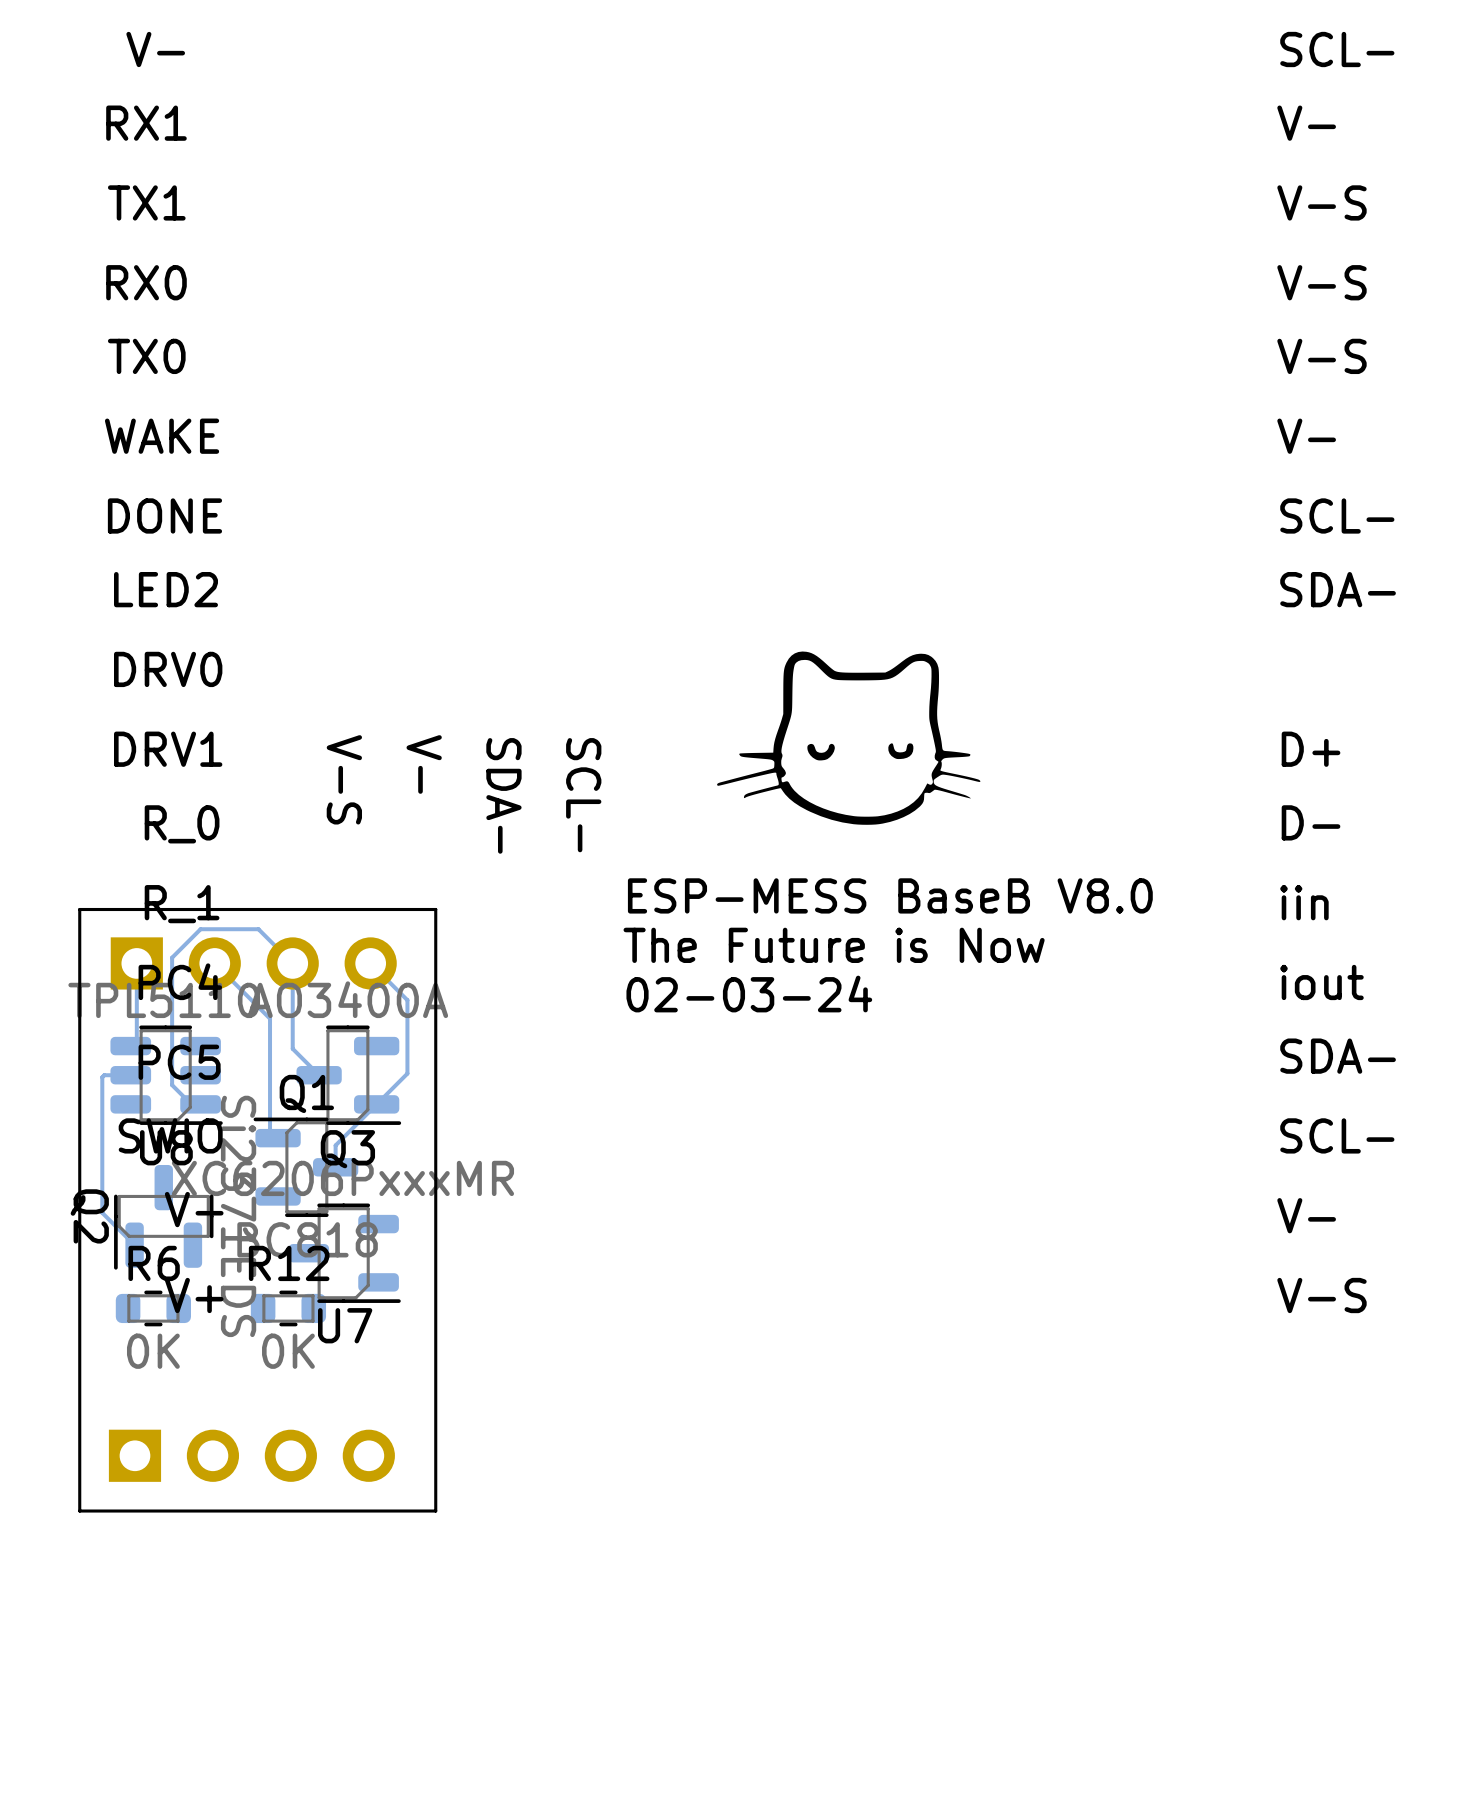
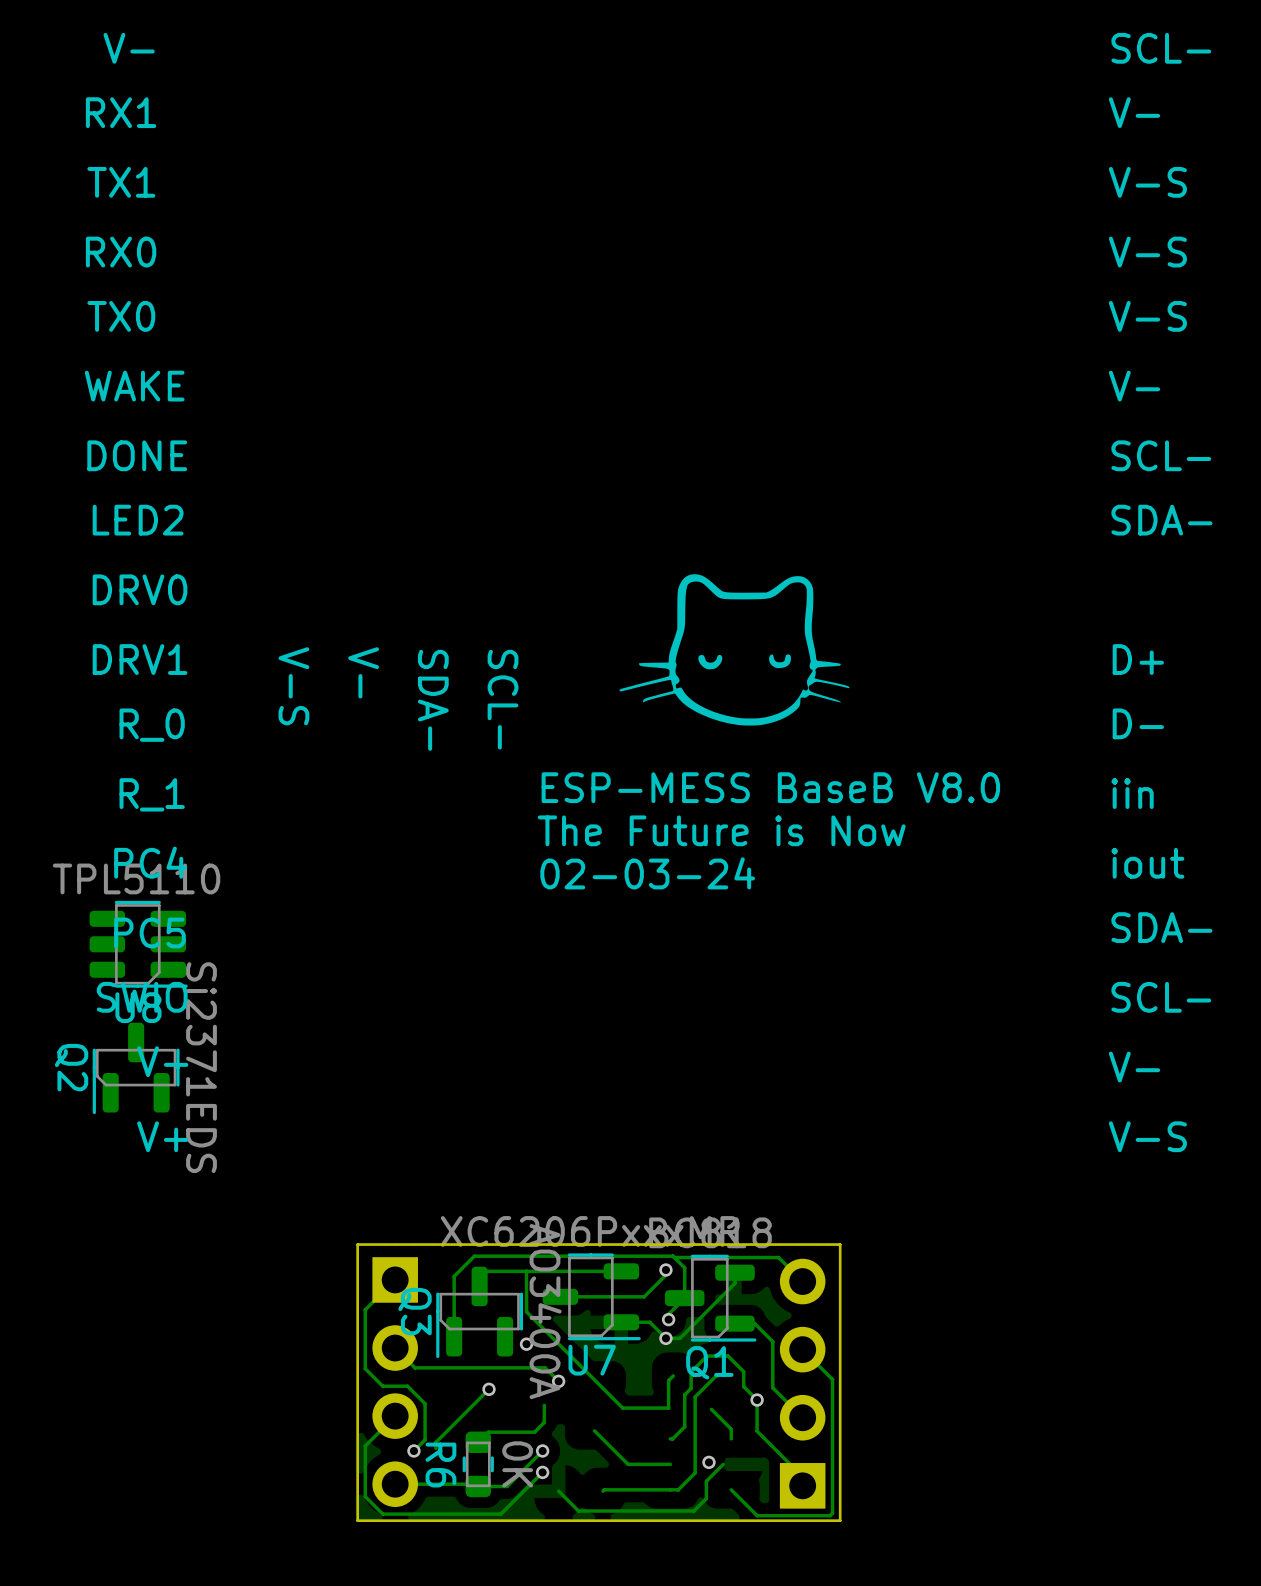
board edge: (435, 909) (79, 909) (79, 1511) (435, 1511) (435, 909) -> none
track: (136, 963) (136, 1040) (130, 1046) -> none
part: (253, 963) -> none
track: (370, 963) (407, 1000) (407, 1073) (335, 1145) (335, 1167) -> none
track: (208, 969) (214, 963) (270, 1018) (270, 1130) (278, 1138) -> none
track: (130, 1075) (104, 1075) (102, 1077) (102, 1212) (134, 1245) -> none
track: (319, 1075) (292, 1048) (292, 963) (258, 929) (200, 929) (172, 957) (172, 1085) (191, 1104) (200, 1104) -> none
Q3 rotation: 0° (348, 1075) -> 90° clockwise (479, 1312)
Q3 position: (348, 1075) -> (479, 1312)
Q1 rotation: 0° (305, 1167) -> 180° (710, 1298)
Q1 position: (305, 1167) -> (710, 1298)
U7 position: (344, 1253) -> (591, 1296)
R6 name position: R6 (154, 1263) -> R6 (440, 1465)
R6 rotation: 0° (153, 1308) -> 90° clockwise (478, 1464)
R6 position: (153, 1308) -> (478, 1464)
R12: 0K (288, 1308) -> none
R6 value position: 0K (153, 1351) -> 0K (517, 1464)
board edge: none -> (840, 1244) (357, 1244) (357, 1520) (840, 1520) (840, 1244)
track: none -> (674, 1257) (778, 1257) (802, 1281) (788, 1295)
track: none -> (665, 1270) (665, 1275) (644, 1296) (548, 1296)
via: none -> (665, 1270)
track: none -> (526, 1271) (526, 1311) (622, 1408) (668, 1408) (668, 1380) (673, 1375)
track: none -> (609, 1271) (485, 1271) (476, 1280)
track: none -> (734, 1272) (734, 1283) (680, 1338) (665, 1338) (649, 1322) (621, 1322)
part rotation: 0° (251, 1455) -> 90° clockwise (395, 1382)
part position: (251, 1455) -> (395, 1382)
track: none -> (395, 1279) (365, 1309) (365, 1368) (382, 1386) (407, 1386) (425, 1403) (425, 1439) (413, 1450)
track: none -> (668, 1319) (668, 1314) (684, 1298) (684, 1267) (673, 1256) (474, 1256) (454, 1276) (454, 1336)
via: none -> (668, 1319)
track: none -> (734, 1323) (754, 1323) (772, 1341) (772, 1387) (802, 1417)
via: none -> (665, 1338)
via: none -> (526, 1344)
track: none -> (395, 1348) (415, 1367) (545, 1367) (558, 1381)
track: none -> (802, 1349) (832, 1379) (832, 1513) (830, 1515) (757, 1515) (731, 1489)
track: none -> (717, 1375) (695, 1396) (695, 1473) (678, 1489) (602, 1491)
via: none -> (558, 1381)
part: none -> (802, 1383)
track: none -> (489, 1389) (435, 1442) (435, 1448)
via: none -> (489, 1389)
via: none -> (757, 1400)
track: none -> (544, 1405) (544, 1422) (534, 1432) (488, 1432) (478, 1442)
track: none -> (711, 1409) (731, 1429) (731, 1438)
track: none -> (395, 1416) (365, 1446) (365, 1496) (382, 1514) (500, 1514) (542, 1472)
track: none -> (594, 1430) (628, 1464) (670, 1464)
track: none -> (670, 1438) (672, 1438) (684, 1426) (684, 1394) (691, 1388) (691, 1371) (707, 1356) (728, 1356) (743, 1371) (743, 1386) (757, 1400) (757, 1431) (802, 1476) (802, 1485)
via: none -> (413, 1450)
track: none -> (542, 1450) (507, 1486) (478, 1486) (476, 1484) (395, 1484)
via: none -> (542, 1450)
via: none -> (708, 1462)
track: none -> (723, 1464) (706, 1481) (706, 1498) (693, 1511) (578, 1511) (558, 1491)
via: none -> (542, 1472)

